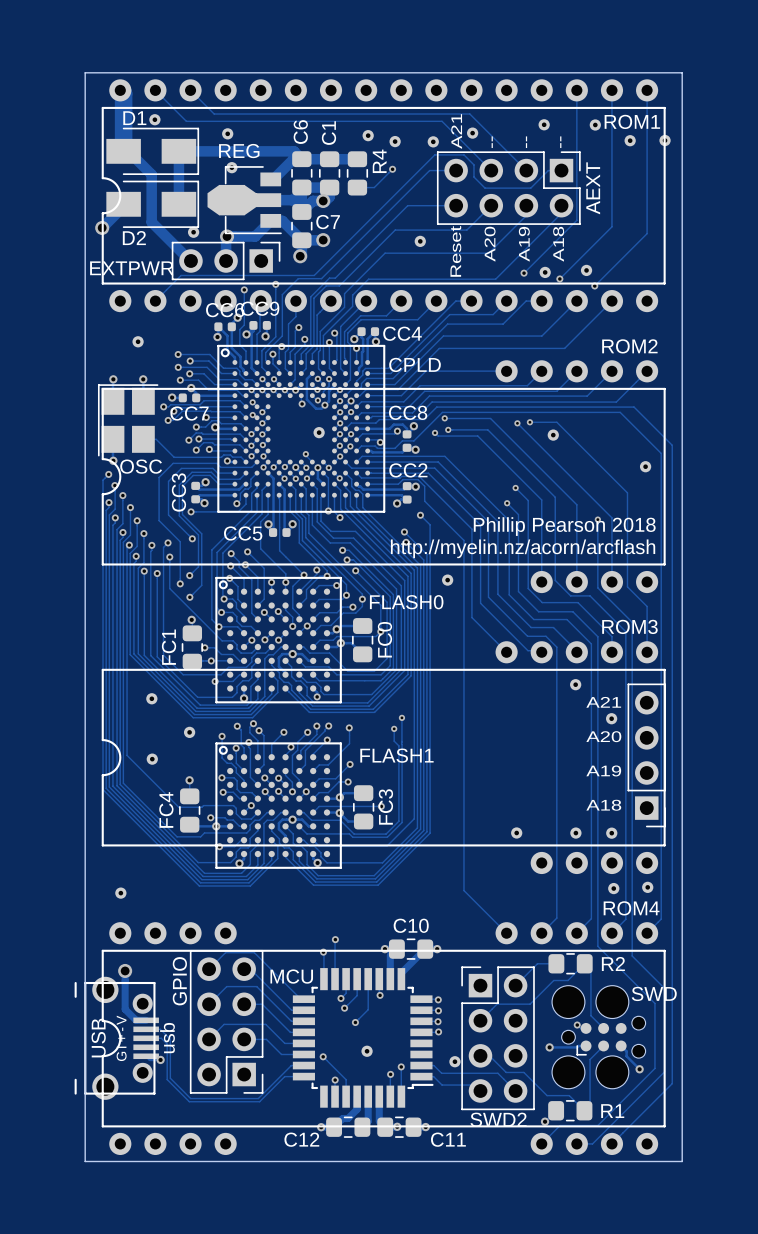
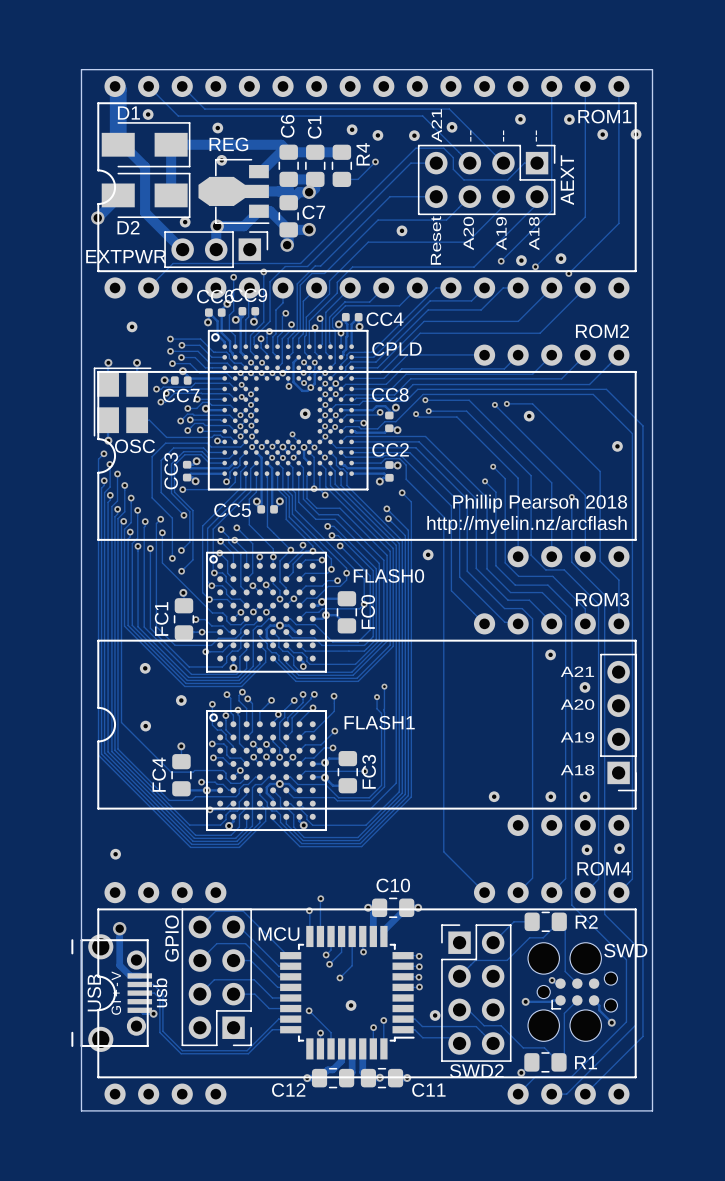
text: http://myelin.nz/acorn/arcflash (523, 548) -> http://myelin.nz/arcflash (526, 524)

